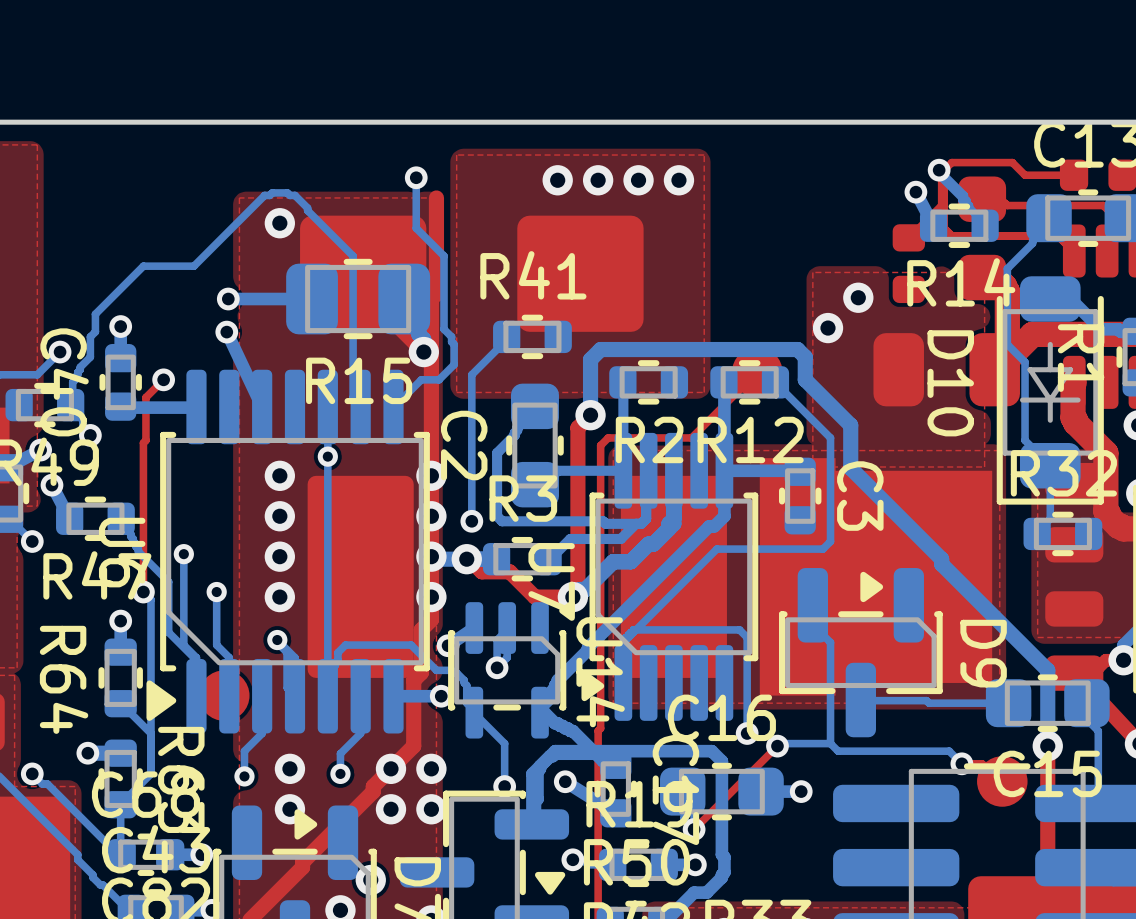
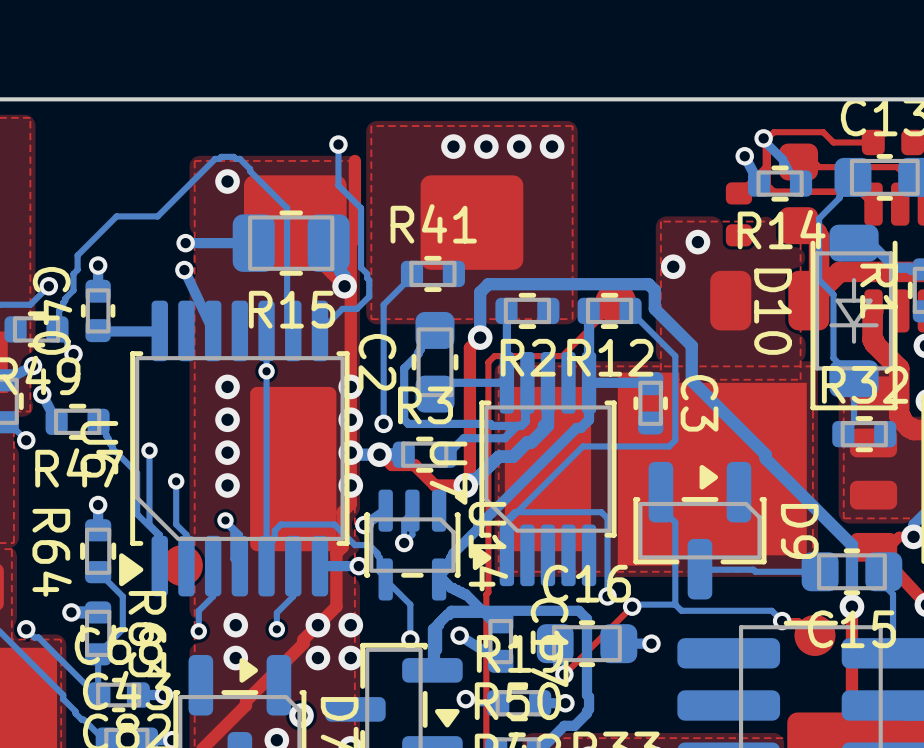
top track: (163, 379) (145, 397) (145, 440) (143, 442) (143, 592) -> none
via: (163, 379) -> none
bottom track: (143, 592) (151, 599) (151, 733) -> none
via: (143, 592) -> none

